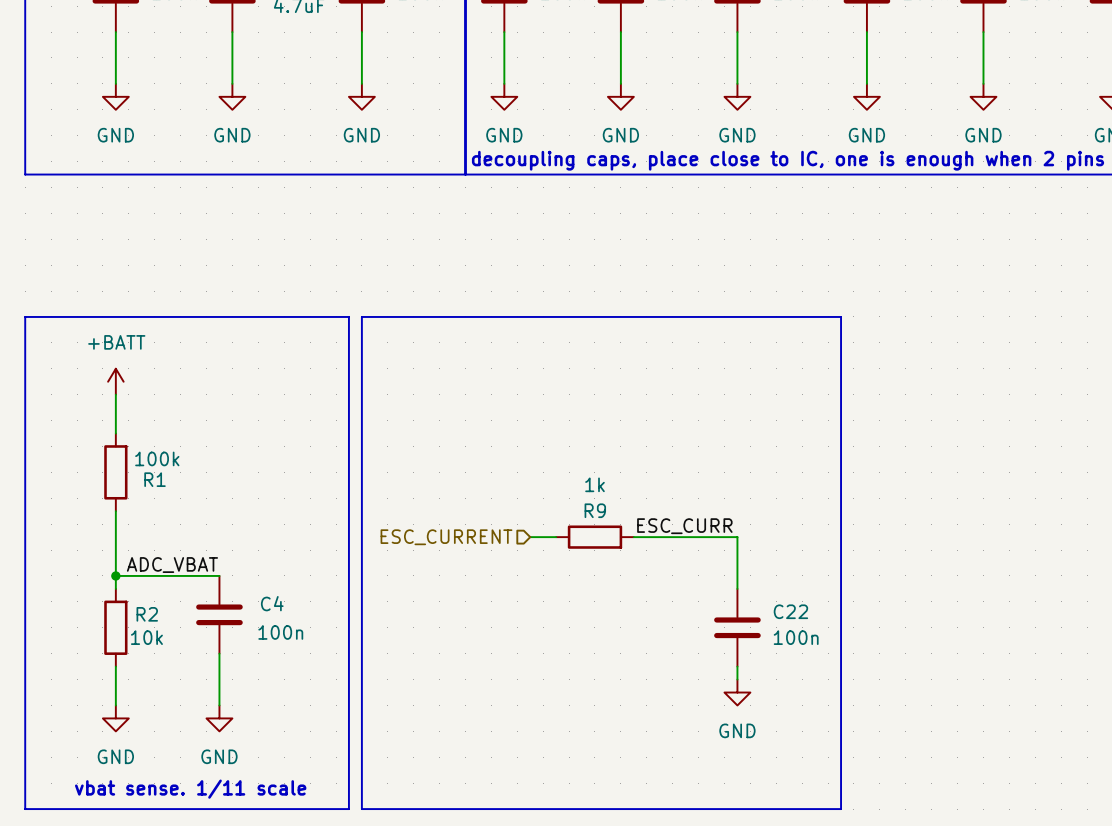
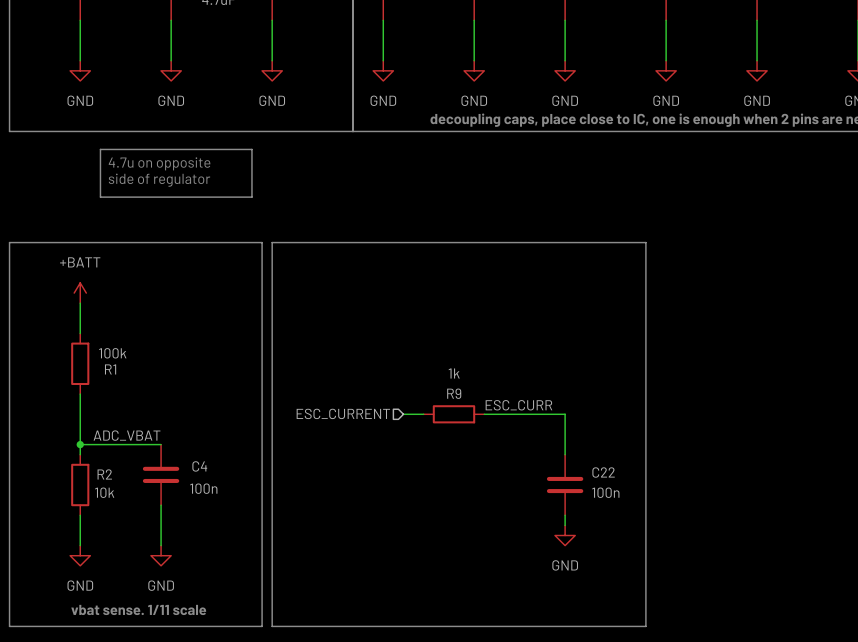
line: none -> (100, 149) (251, 149) (251, 197) (100, 197) (100, 149)
text: none -> 4.7u on opposite (159, 163)
text: none -> side of regulator (159, 180)

